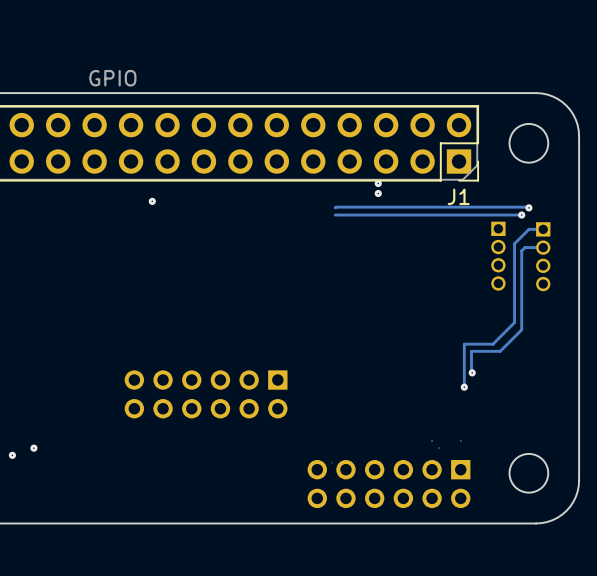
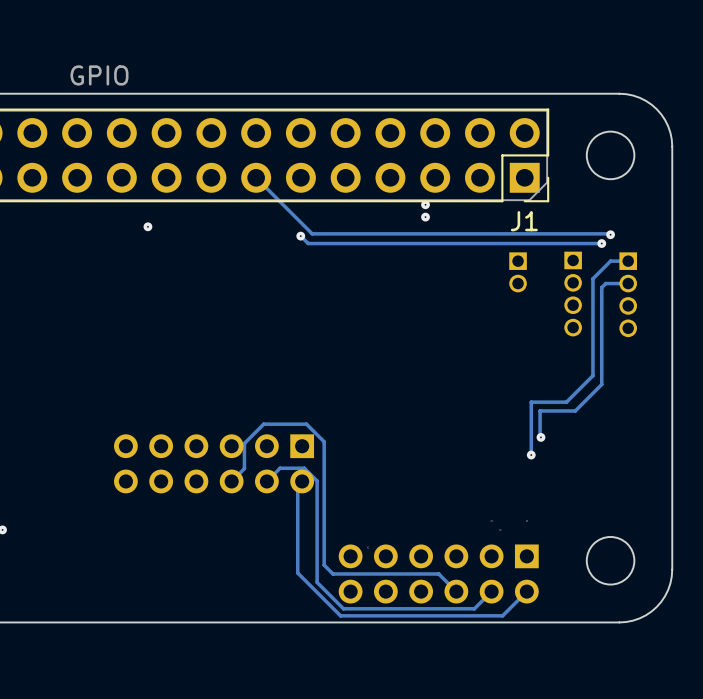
track: (335, 207) (335, 207) -> (373, 233) (312, 233) (256, 177)
track: none -> (300, 236) (308, 243) (372, 243)
via: none -> (300, 236)
part: none -> (518, 272)
track: none -> (227, 485) (244, 468) (244, 443) (263, 424) (306, 424) (324, 441) (324, 565) (332, 573) (438, 573) (456, 591)
track: none -> (262, 485) (280, 468) (304, 468) (317, 480) (317, 582) (343, 608) (474, 608) (491, 591)
track: none -> (297, 485) (297, 573) (340, 615) (502, 615) (526, 591)

